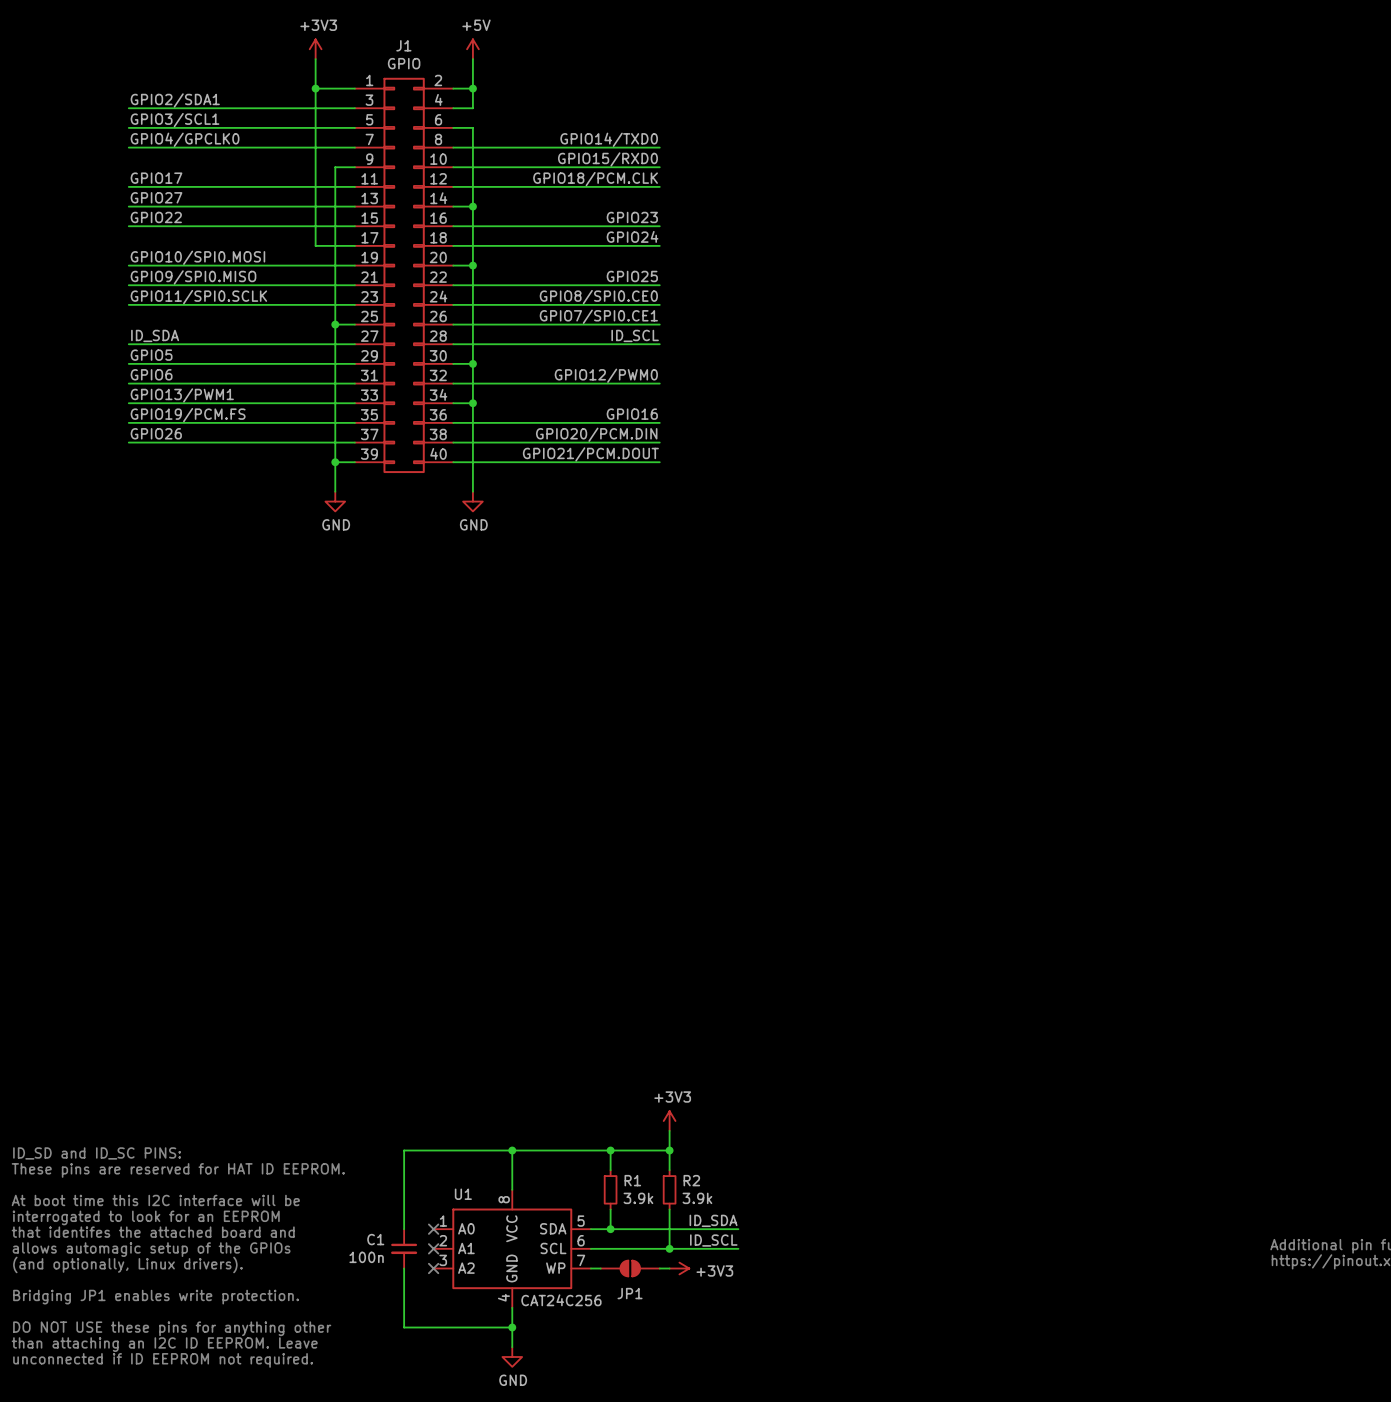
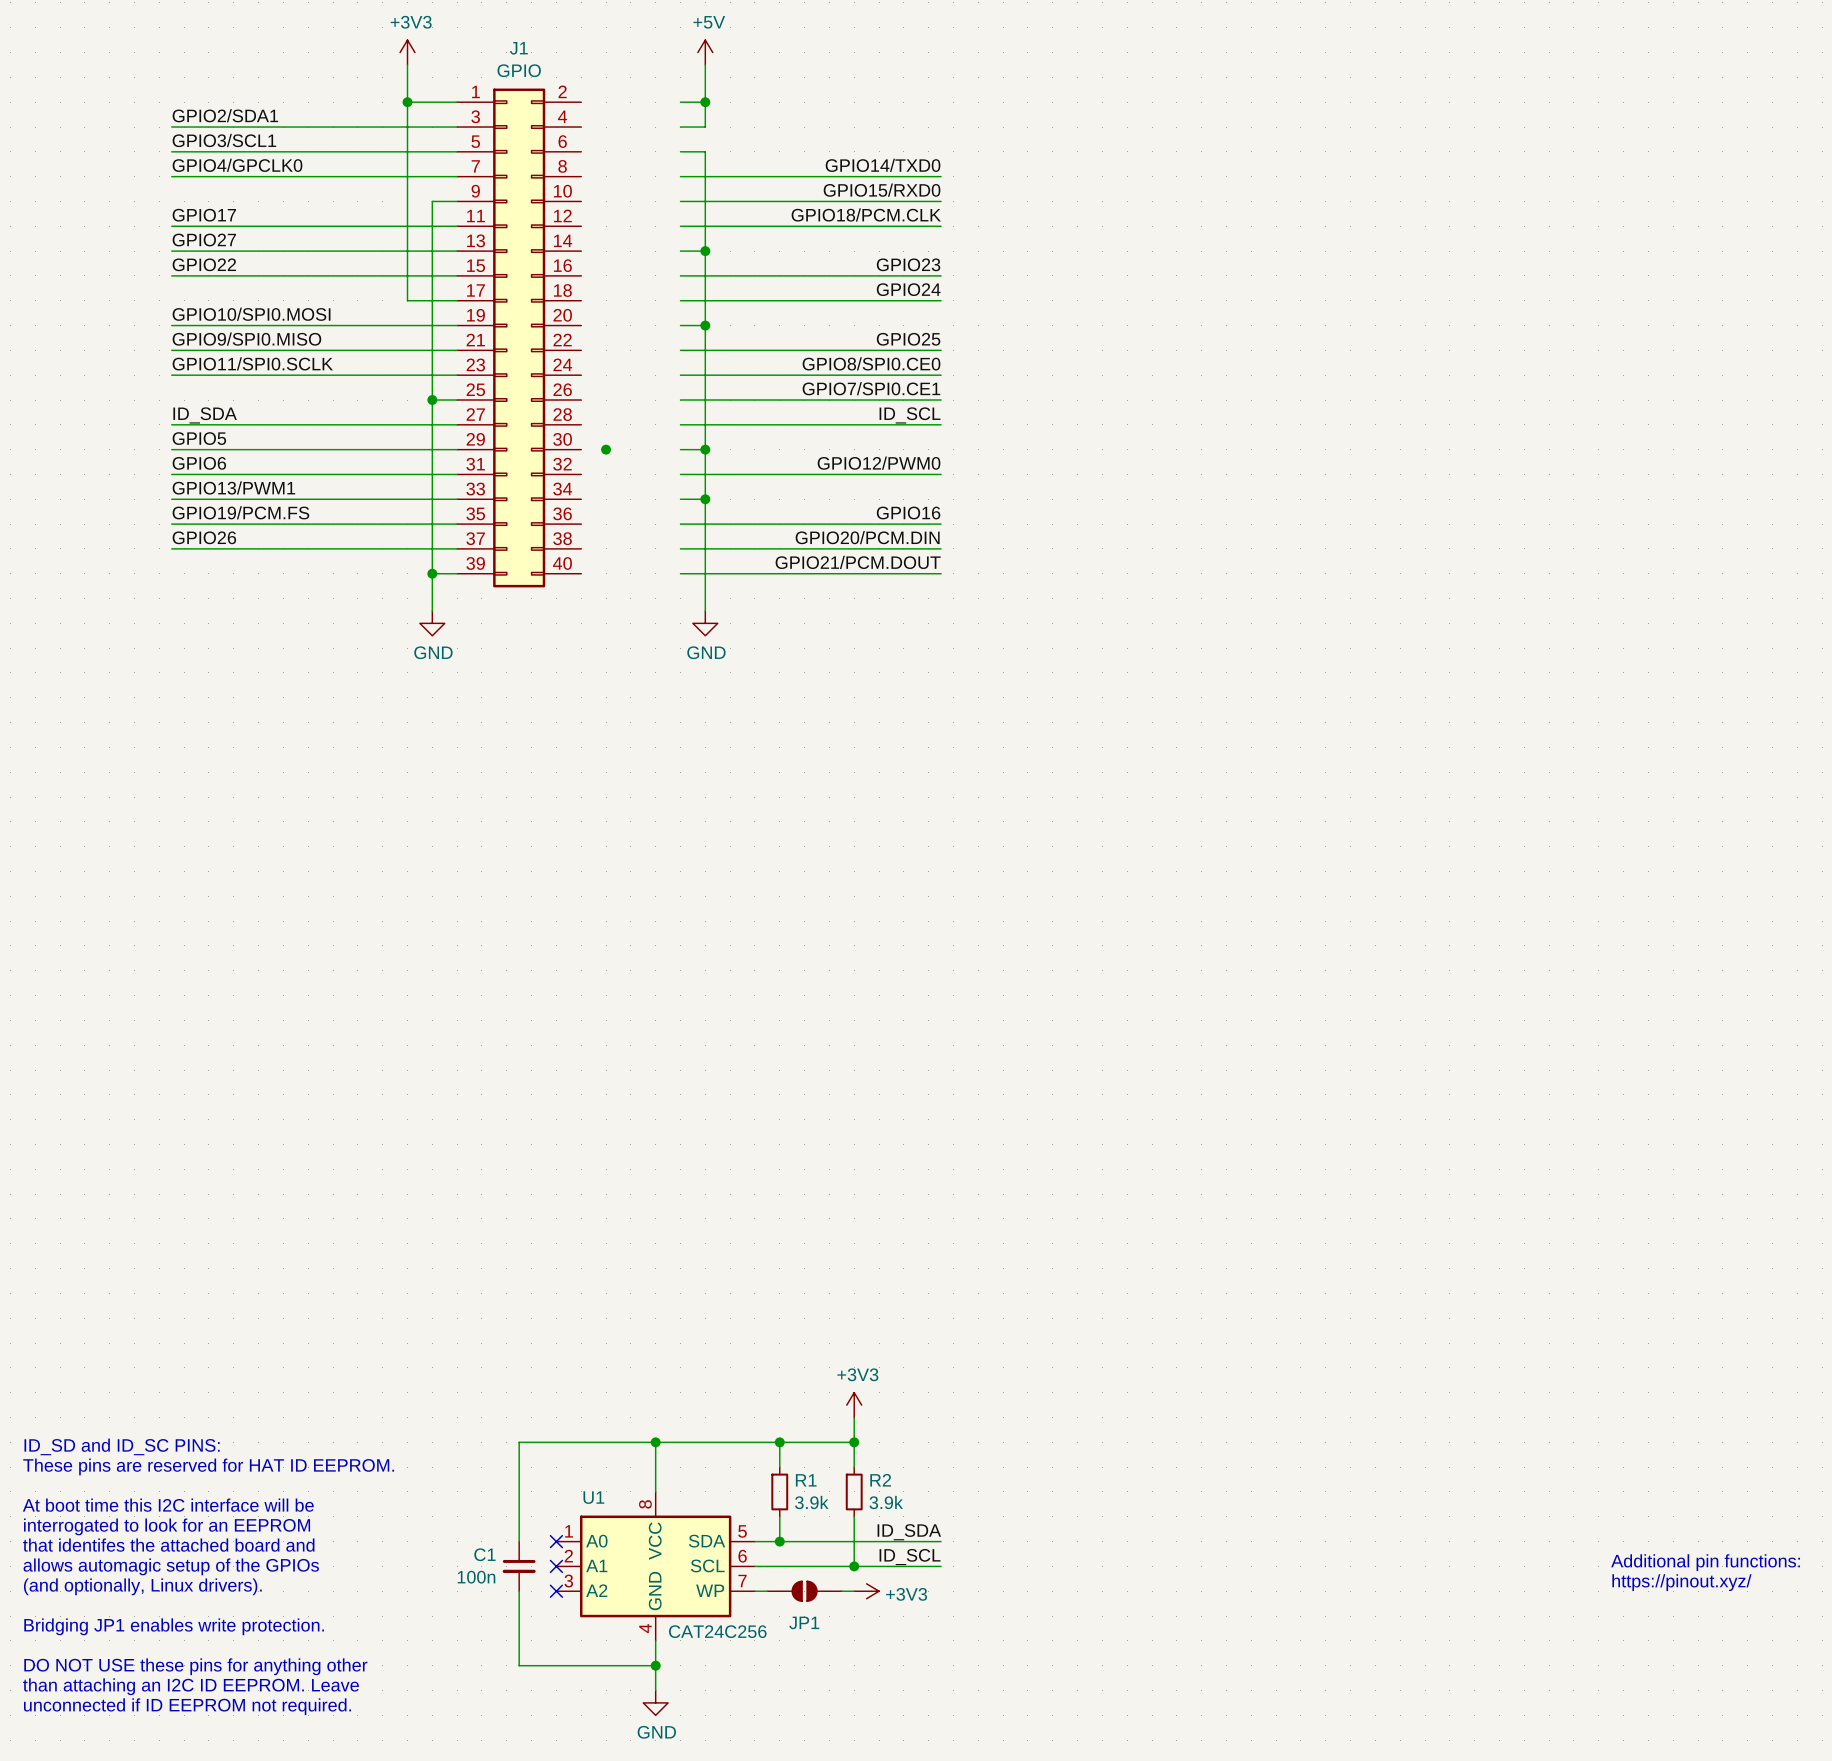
power symbol position: +5V (472, 49) -> +5V (705, 52)
wire: (472, 59) (472, 108) (453, 108) -> (705, 64) (705, 127) (680, 127)
wire: (453, 88) (472, 88) -> (680, 102) (705, 102)
junction: (472, 88) -> none
junction: none -> (705, 102)
wire: (453, 127) (472, 127) (472, 491) -> (680, 151) (705, 151) (705, 610)
label position: GPIO14/TXD0 (609, 139) -> GPIO14/TXD0 (883, 165)
wire: (453, 147) (531, 147) -> none
wire: none -> (841, 176) (941, 176)
label position: GPIO15/RXD0 (607, 159) -> GPIO15/RXD0 (882, 190)
wire: (453, 167) (531, 167) -> none
wire: none -> (841, 201) (941, 201)
label position: GPIO18/PCM.CLK (595, 179) -> GPIO18/PCM.CLK (866, 214)
wire: (453, 186) (531, 186) -> none
wire: none -> (841, 226) (941, 226)
wire: (453, 206) (472, 206) -> (680, 251) (705, 251)
junction: (472, 206) -> none
junction: none -> (705, 251)
label position: GPIO23 (632, 217) -> GPIO23 (908, 264)
wire: (453, 226) (531, 226) -> none
wire: none -> (841, 275) (941, 275)
label position: GPIO24 (632, 236) -> GPIO24 (908, 289)
wire: (453, 245) (531, 245) -> none
wire: none -> (841, 300) (941, 300)
wire: (453, 265) (472, 265) -> (680, 325) (705, 325)
junction: (472, 265) -> none
junction: none -> (705, 325)
label position: GPIO25 (632, 276) -> GPIO25 (908, 339)
wire: (453, 285) (531, 285) -> none
wire: none -> (841, 350) (941, 350)
label position: GPIO8/SPI0.CE0 (598, 297) -> GPIO8/SPI0.CE0 (871, 363)
wire: (453, 304) (531, 304) -> none
wire: none -> (841, 375) (941, 375)
label position: GPIO7/SPI0.CE1 (598, 316) -> GPIO7/SPI0.CE1 (871, 388)
wire: (453, 324) (531, 324) -> none
wire: none -> (841, 400) (941, 400)
label position: ID_SCL (635, 335) -> ID_SCL (910, 415)
wire: (453, 344) (531, 344) -> none
wire: none -> (841, 424) (941, 424)
wire: (453, 363) (472, 363) -> (680, 449) (705, 449)
junction: none -> (705, 449)
label position: GPIO12/PWM0 (606, 375) -> GPIO12/PWM0 (879, 463)
wire: (453, 383) (531, 383) -> none
wire: none -> (841, 474) (941, 474)
wire: (453, 403) (472, 403) -> (680, 499) (705, 499)
junction: (472, 403) -> none
junction: none -> (705, 499)
label position: GPIO16 (632, 414) -> GPIO16 (908, 513)
wire: (453, 422) (531, 422) -> none
wire: none -> (841, 524) (941, 524)
label position: GPIO20/PCM.DIN (596, 434) -> GPIO20/PCM.DIN (867, 537)
wire: (453, 442) (531, 442) -> none
wire: none -> (841, 548) (941, 548)
label position: GPIO21/PCM.DOUT (590, 454) -> GPIO21/PCM.DOUT (858, 562)
wire: (453, 462) (531, 462) -> none
wire: none -> (841, 573) (941, 573)
power symbol position: GND (472, 501) -> GND (705, 623)

